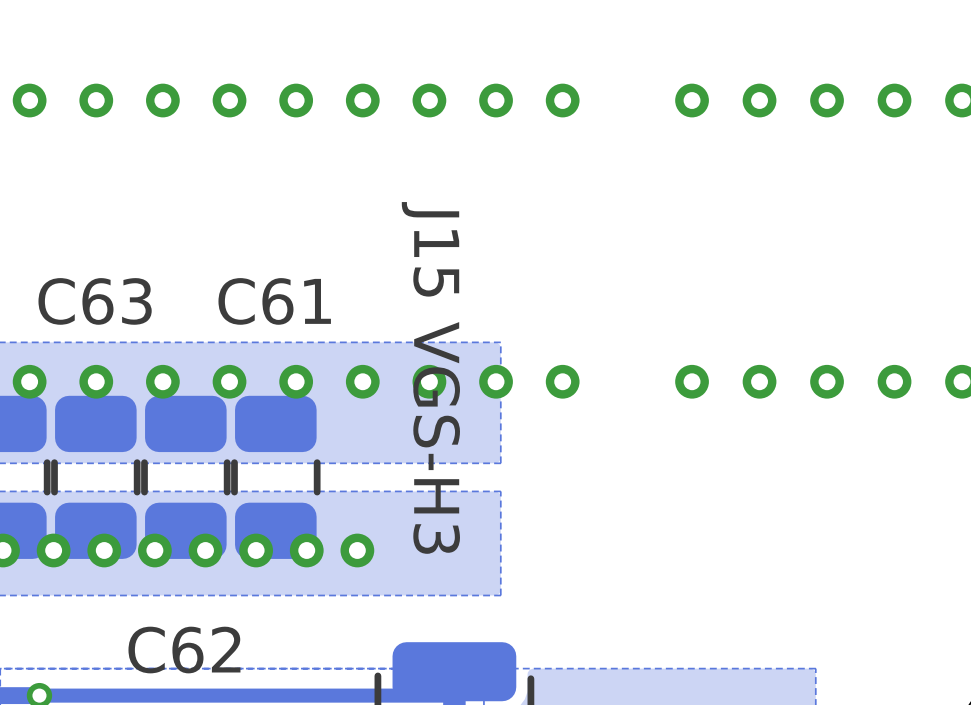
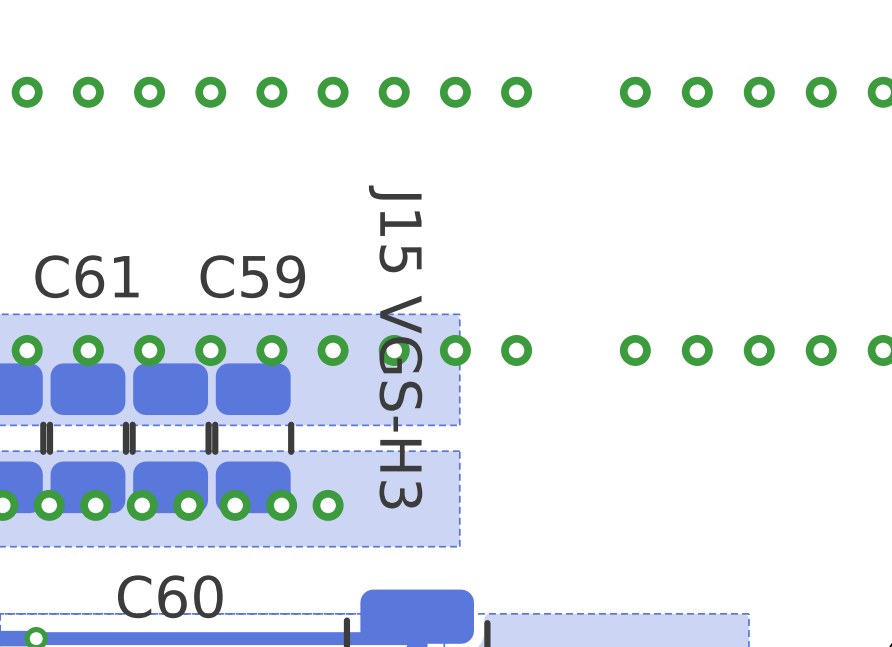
text: C63 (95, 301) -> C61 (86, 276)
text: C61 (274, 301) -> C59 (252, 276)
text: C62 (184, 650) -> C60 (170, 596)

